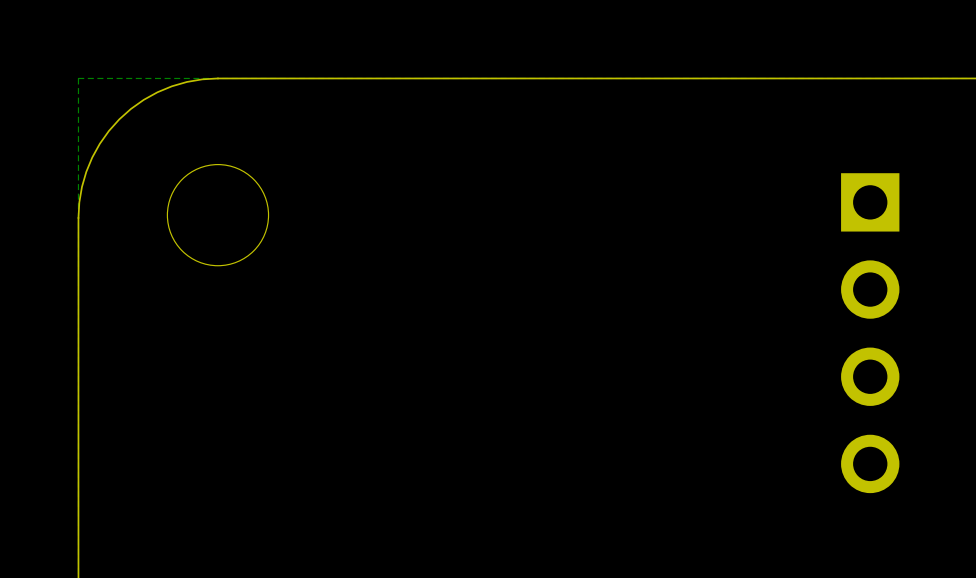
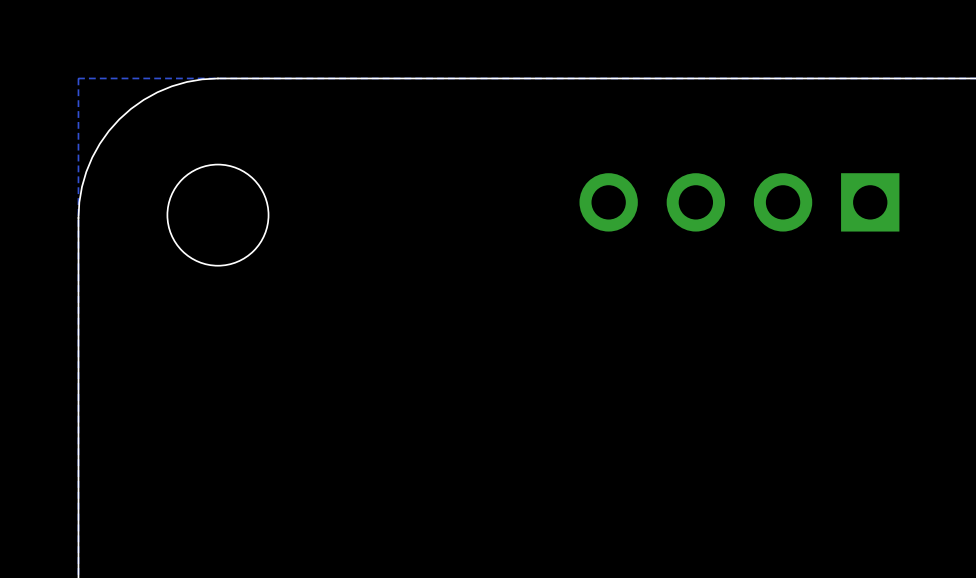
part rotation: 0° (870, 333) -> 90° clockwise (739, 202)

